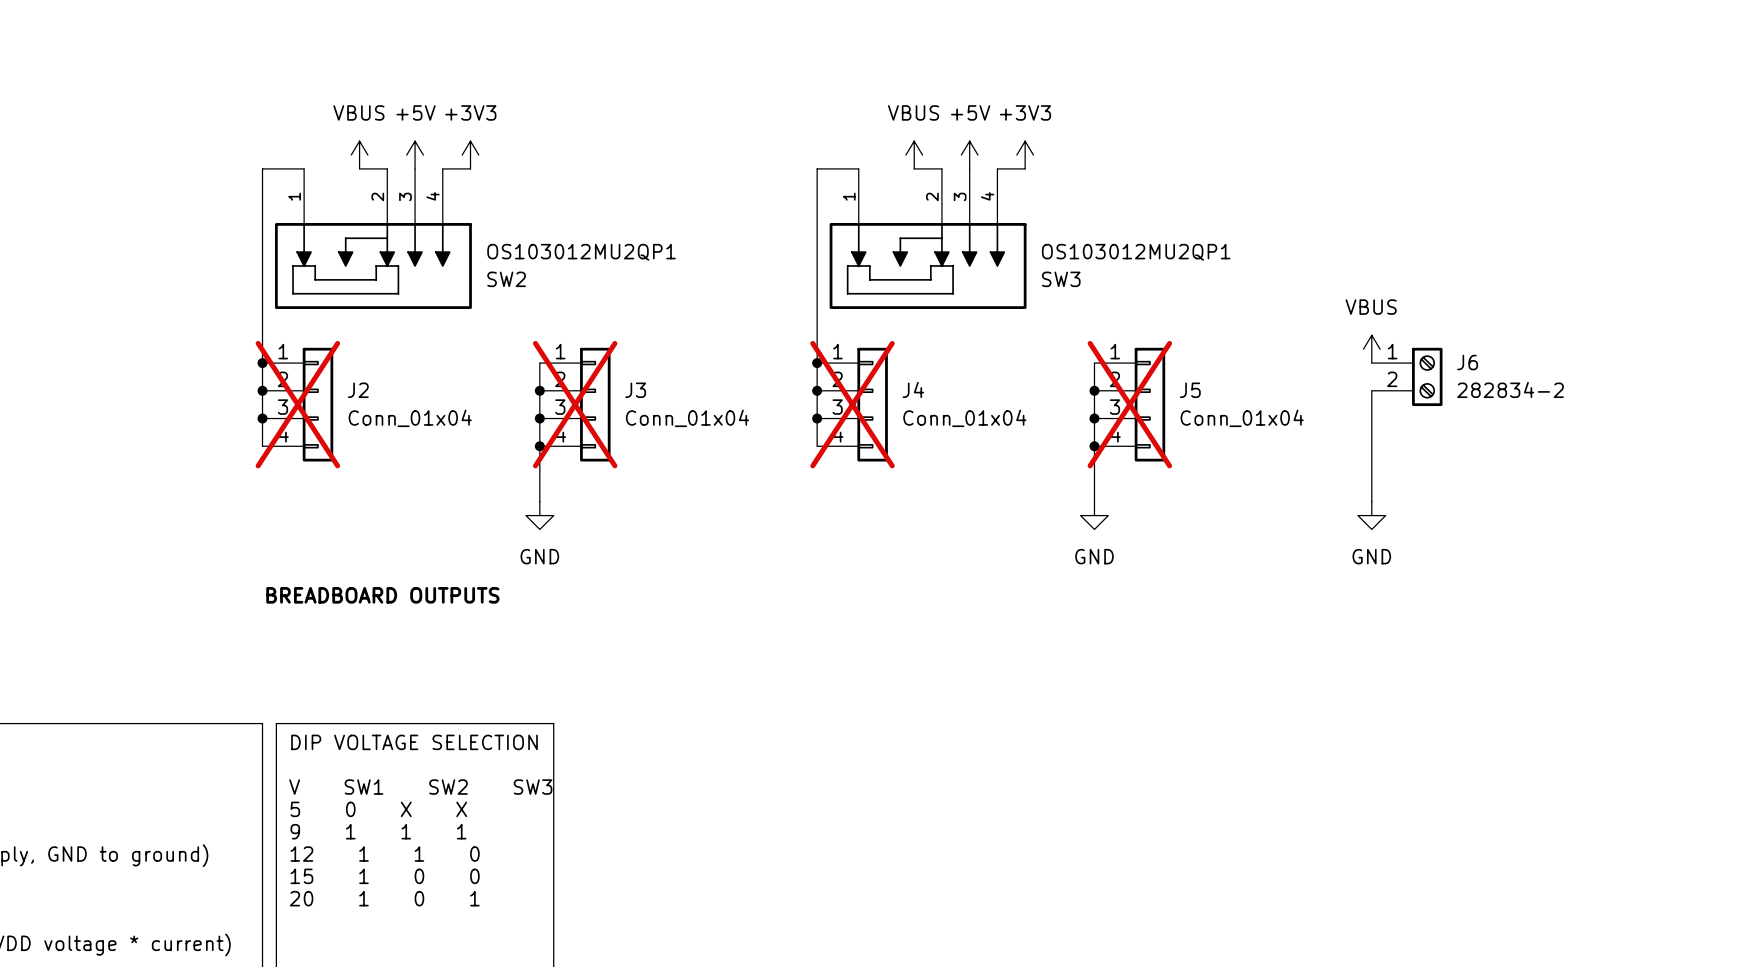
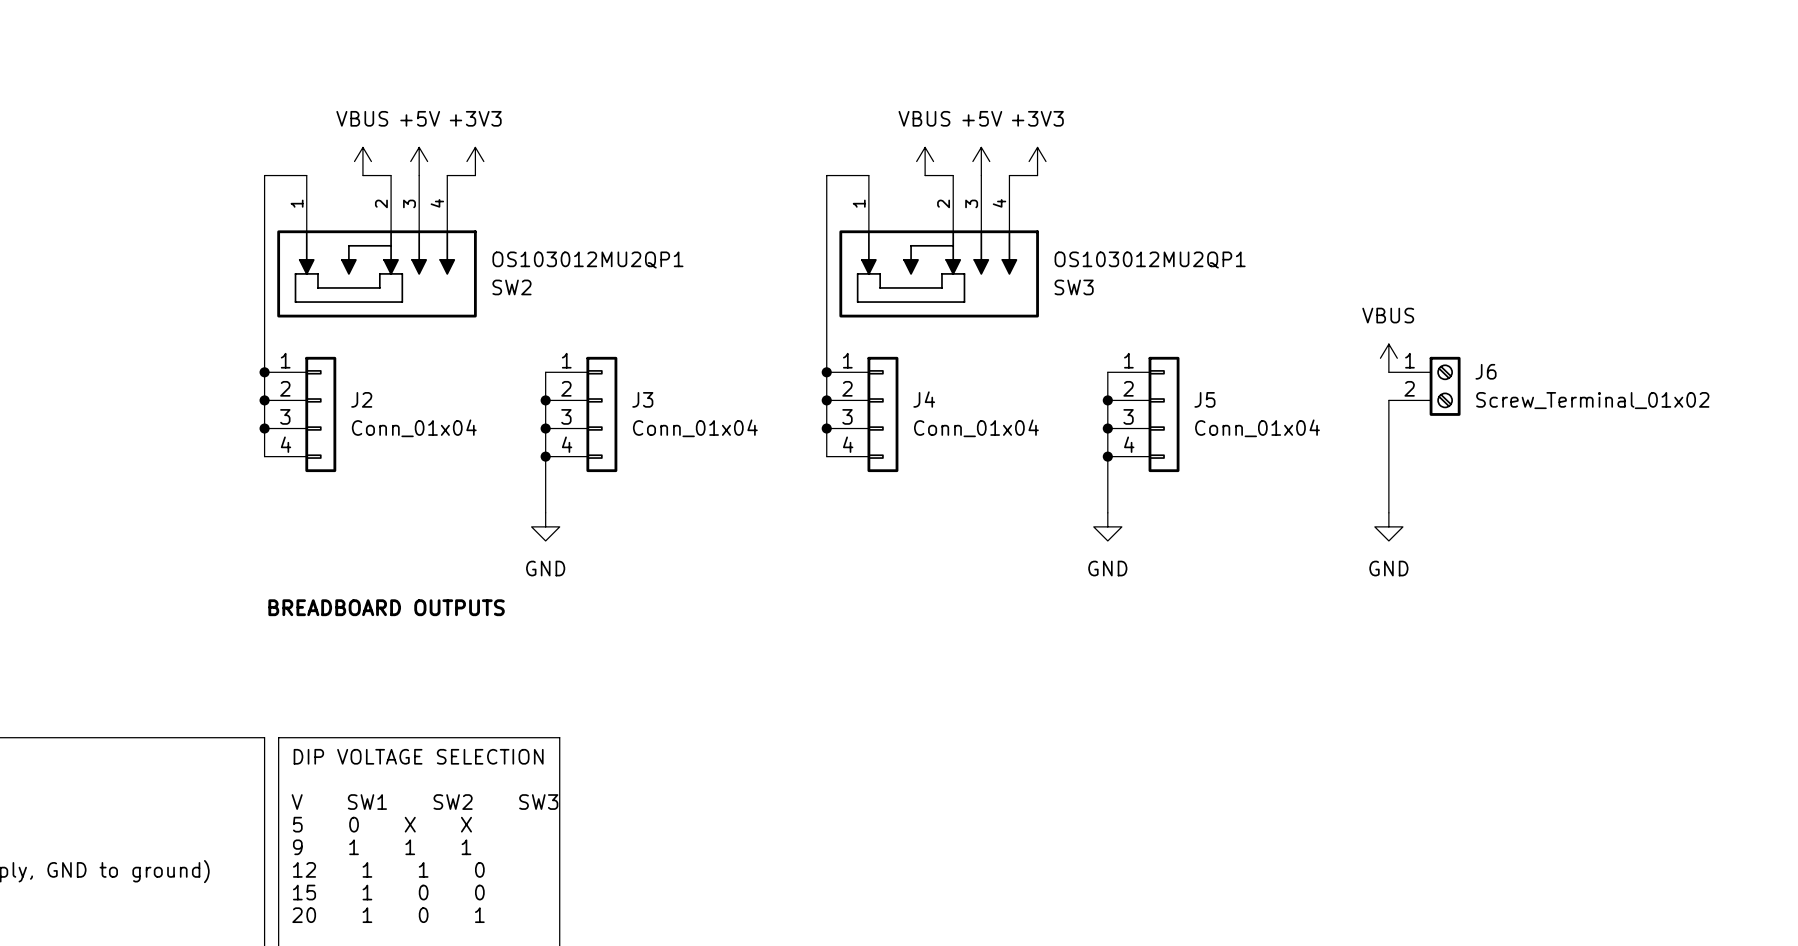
J6 value: 282834-2 (1510, 389) -> Screw_Terminal_01x02 (1592, 400)
J2 do-not-place cross: (297, 404) -> none
J3 do-not-place cross: (575, 404) -> none
J4 do-not-place cross: (852, 404) -> none
J5 do-not-place cross: (1129, 404) -> none

